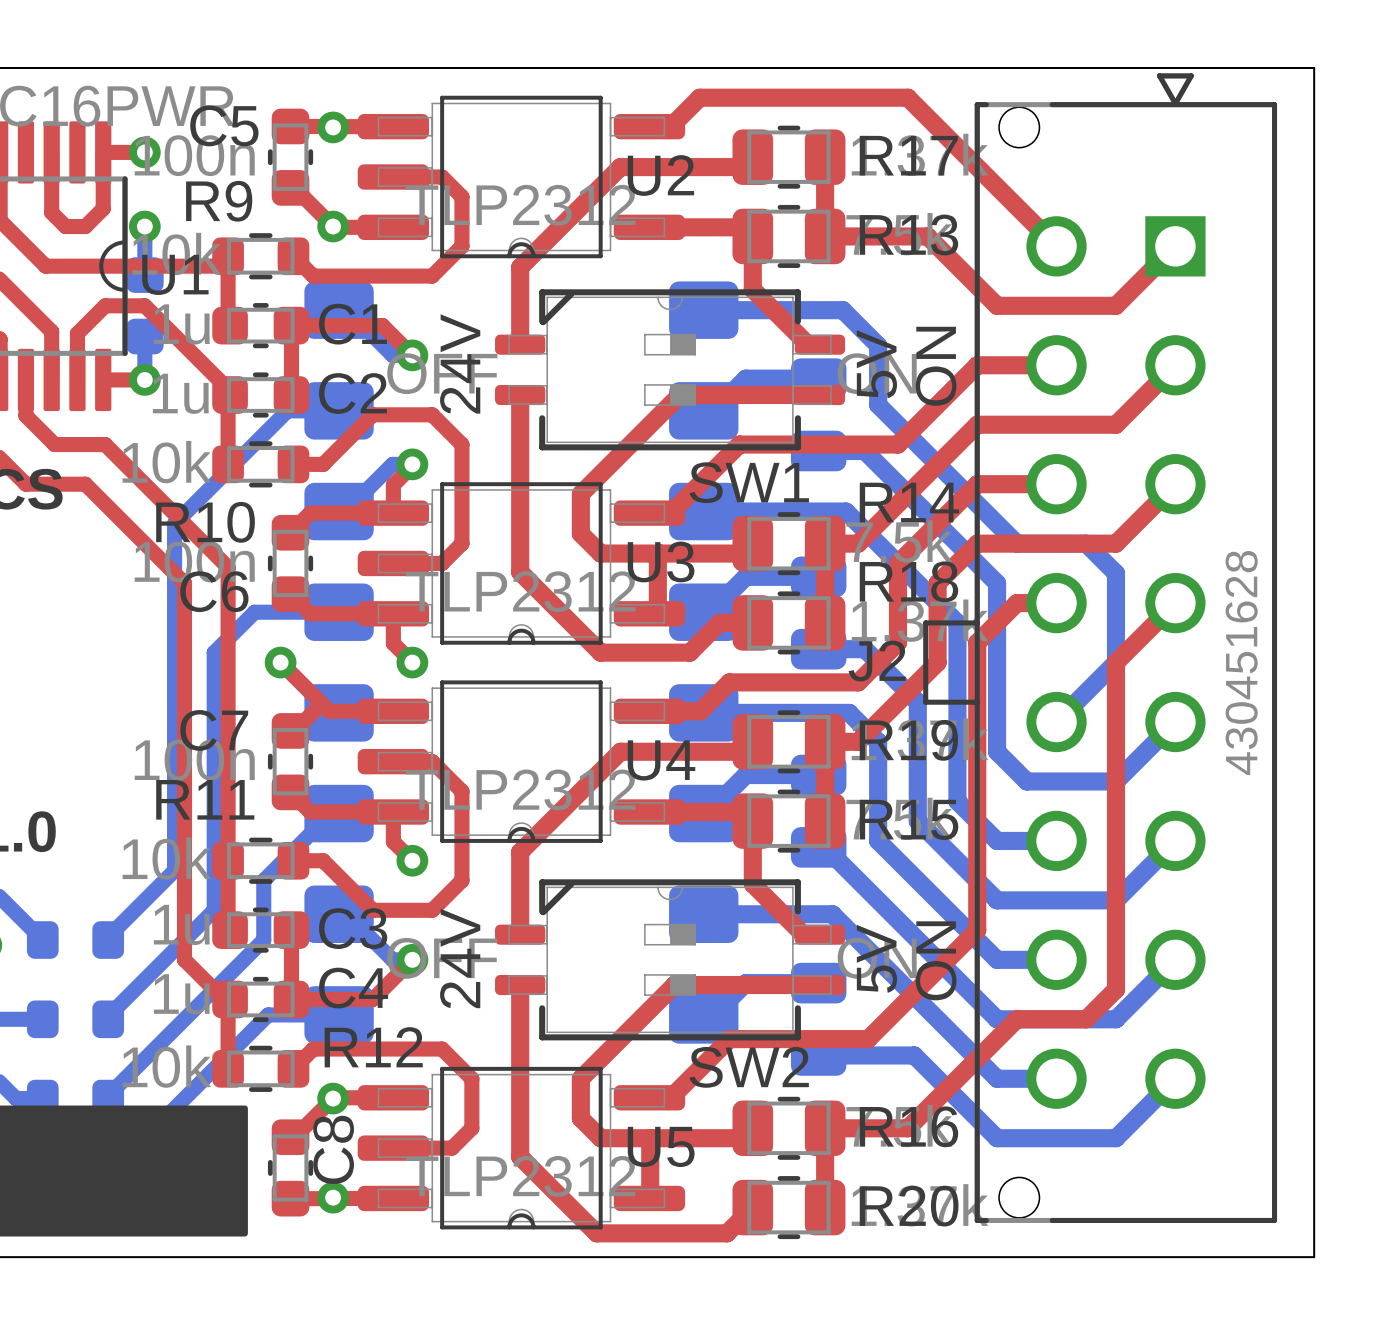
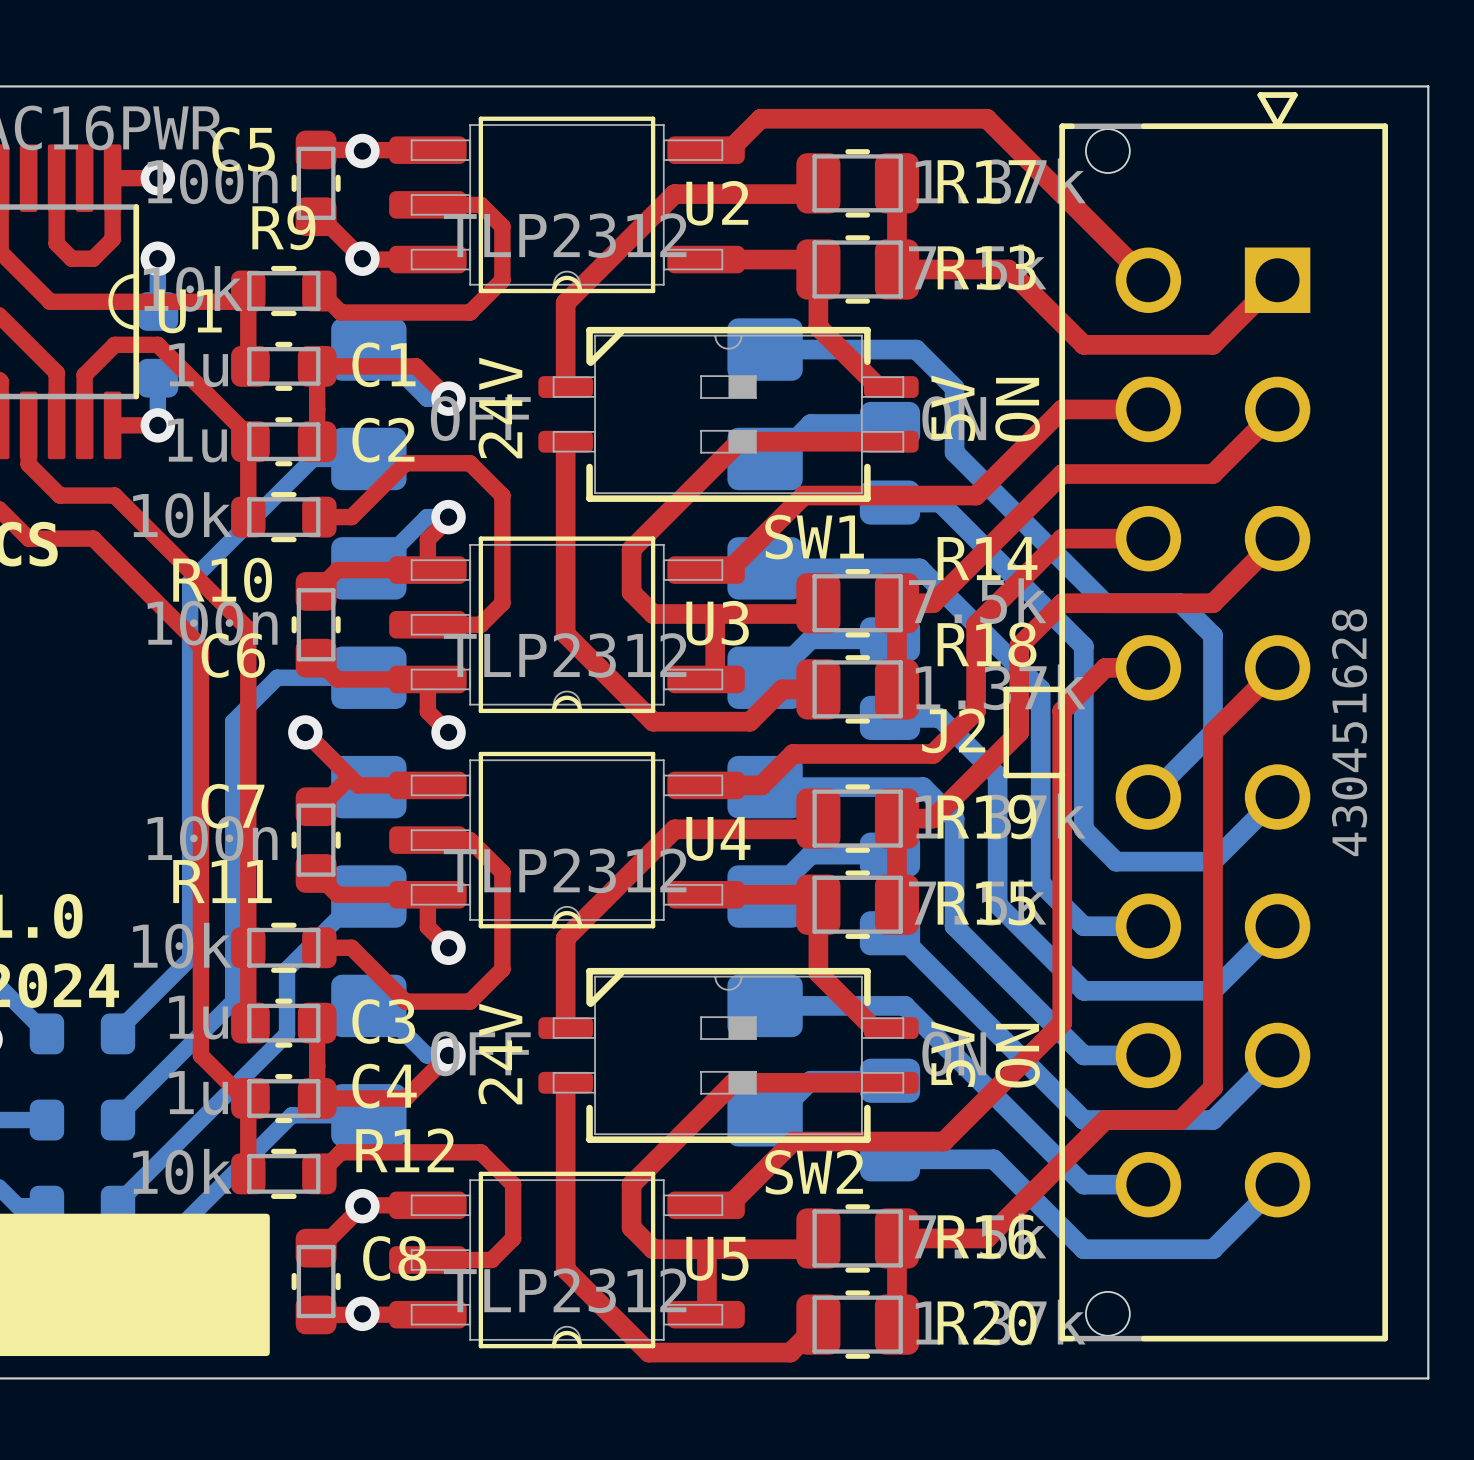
R9 name position: R9 (219, 201) -> R9 (283, 227)
C8 name rotation: 0° (333, 1149) -> 90° clockwise (394, 1258)

